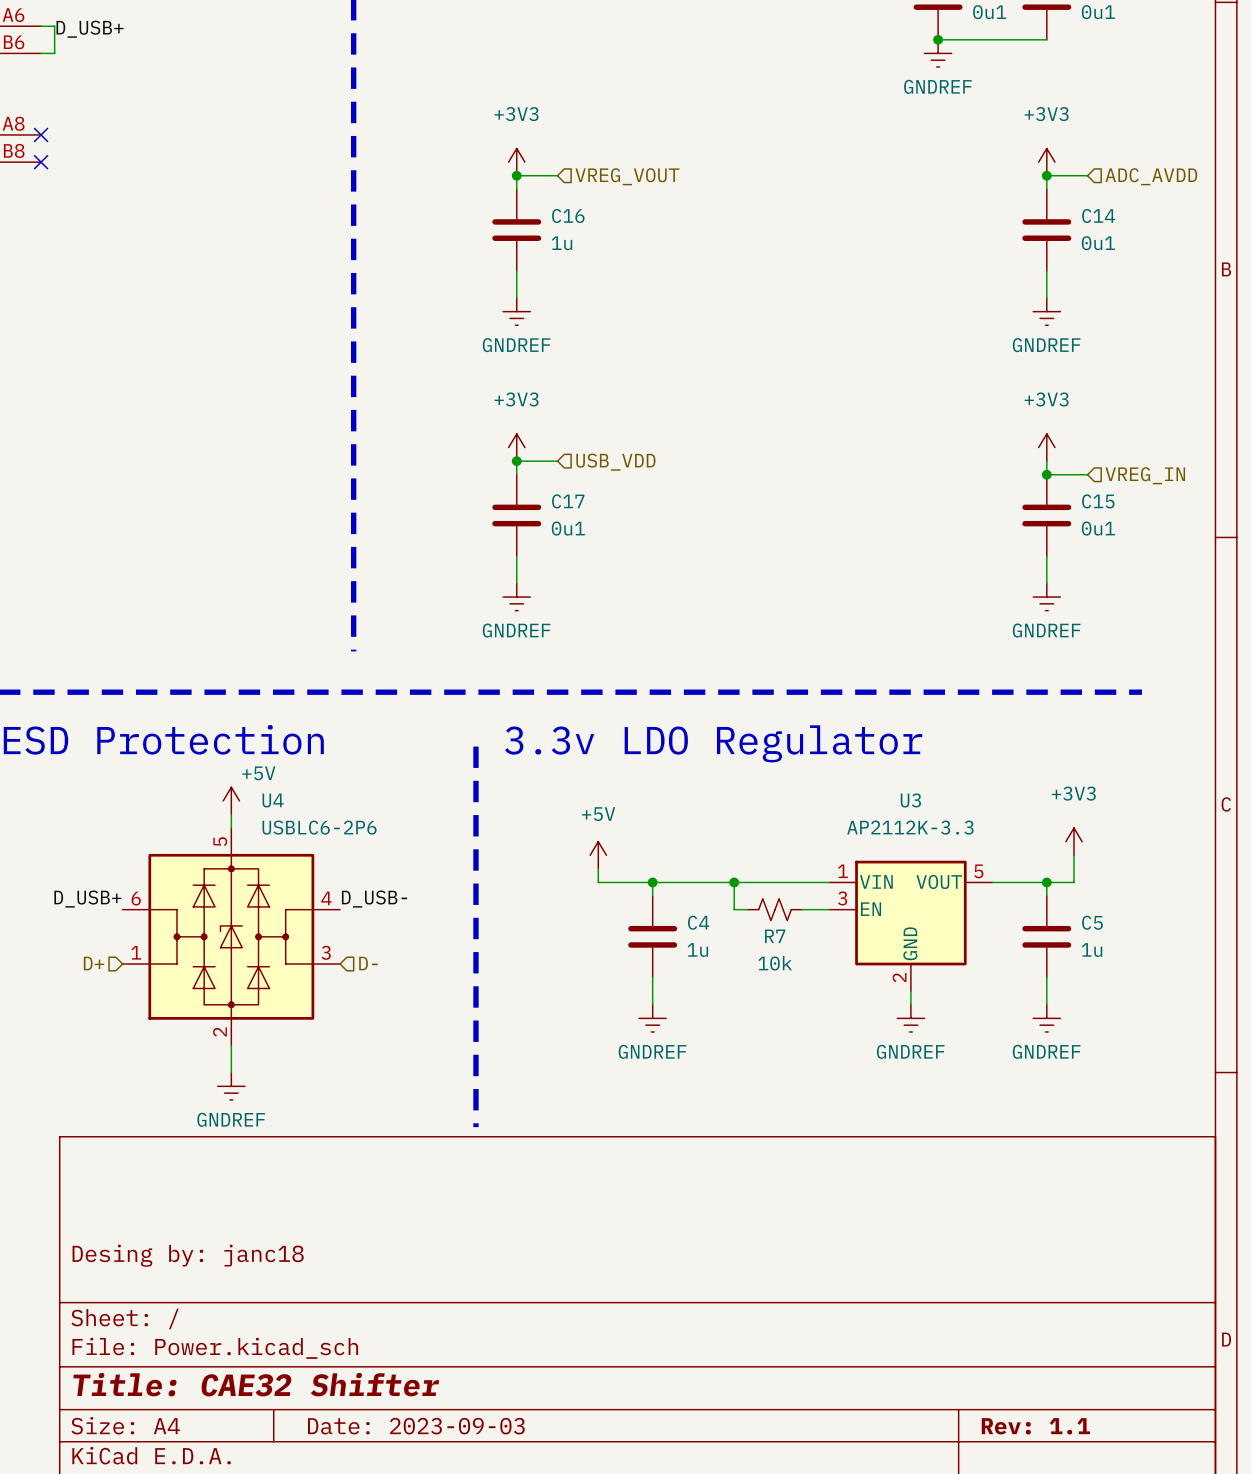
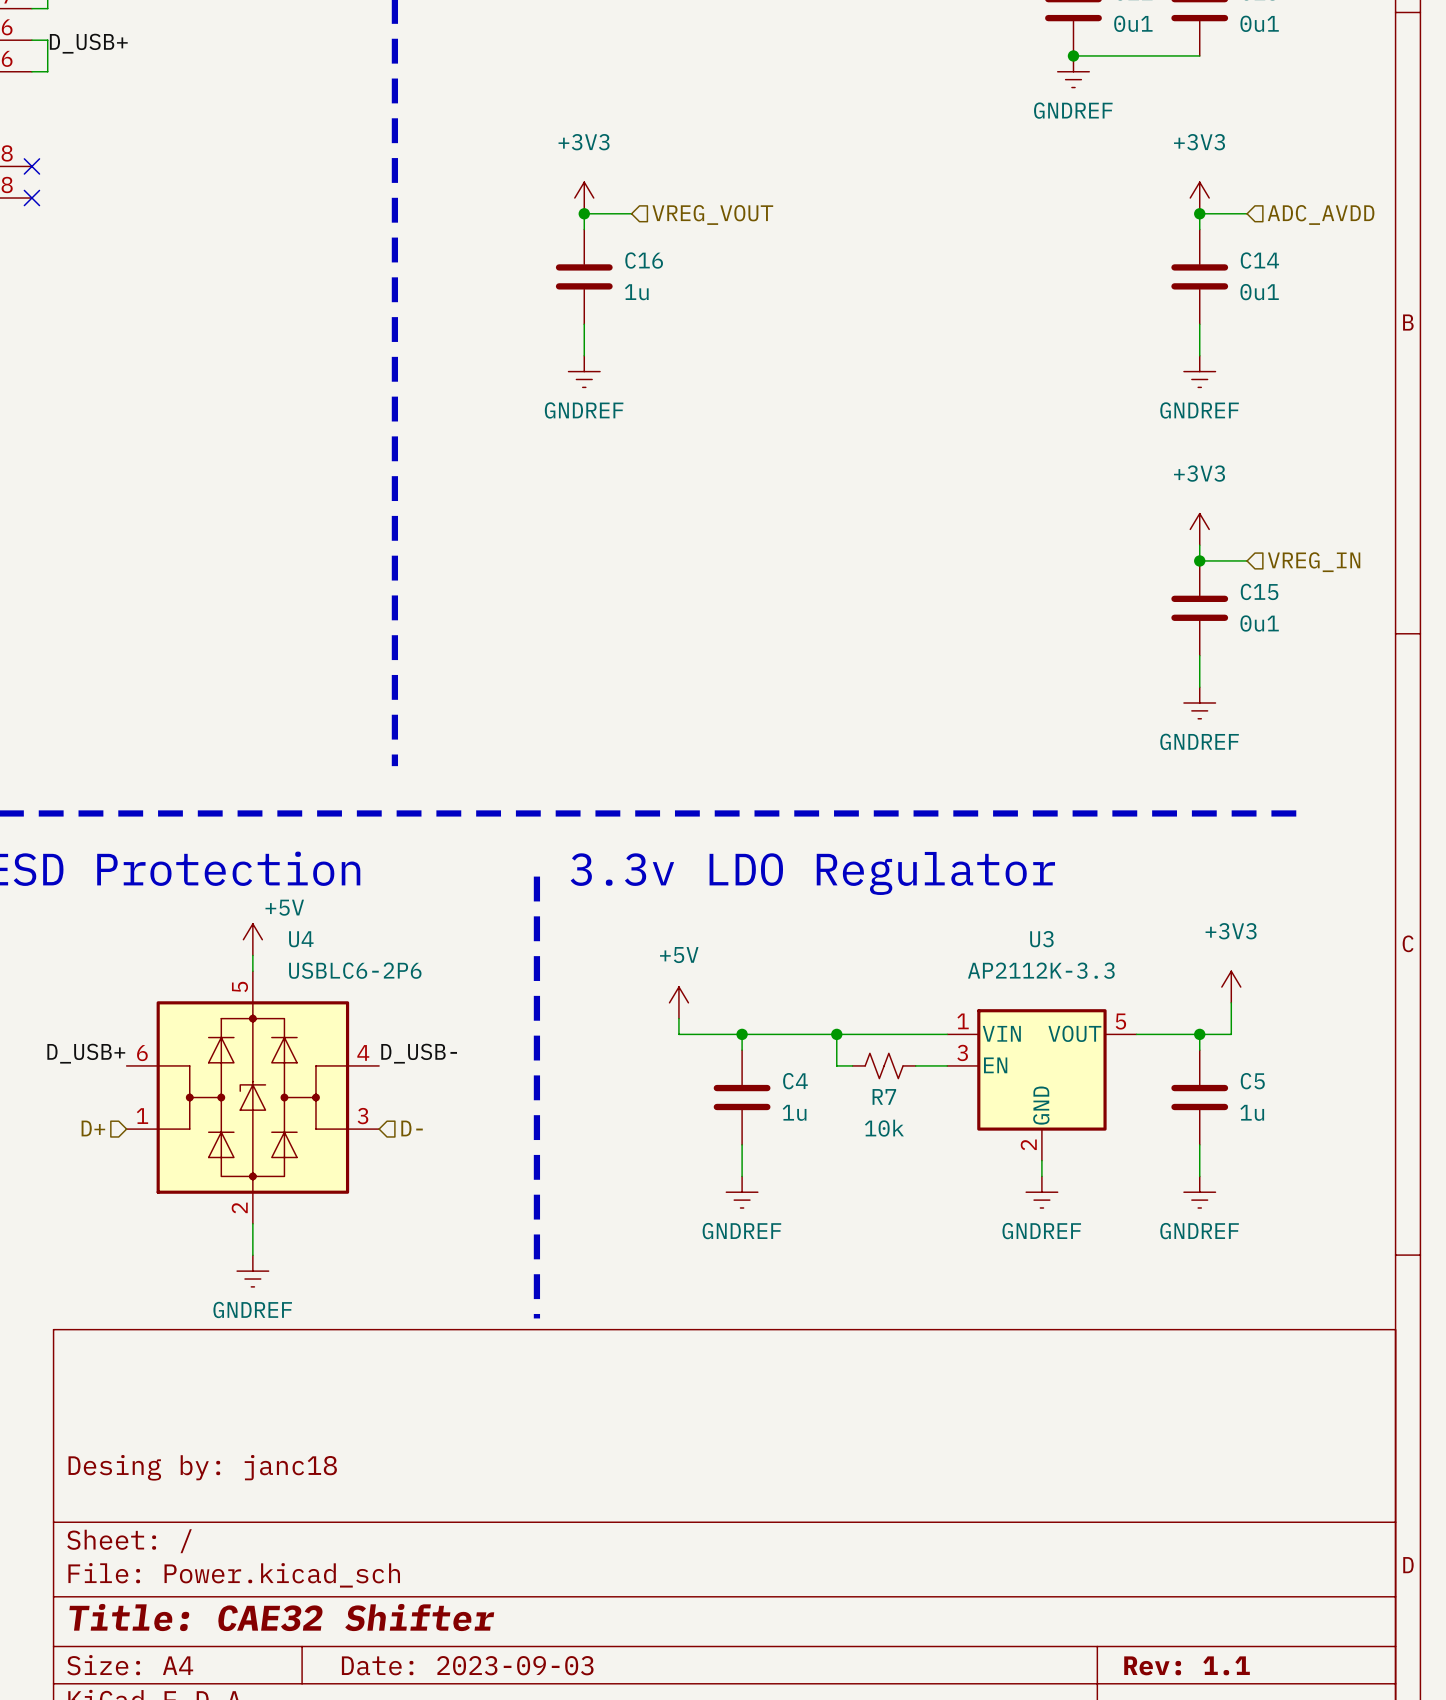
power symbol: +3V3 (516, 447) -> none
junction: (516, 461) -> none
wire: (557, 461) (516, 461) (516, 474) -> none
hierarchical label: USB_VDD (615, 462) -> none
C17: 0u1 (516, 515) -> none
wire: (516, 556) (516, 583) -> none
power symbol: GNDREF (516, 597) -> none

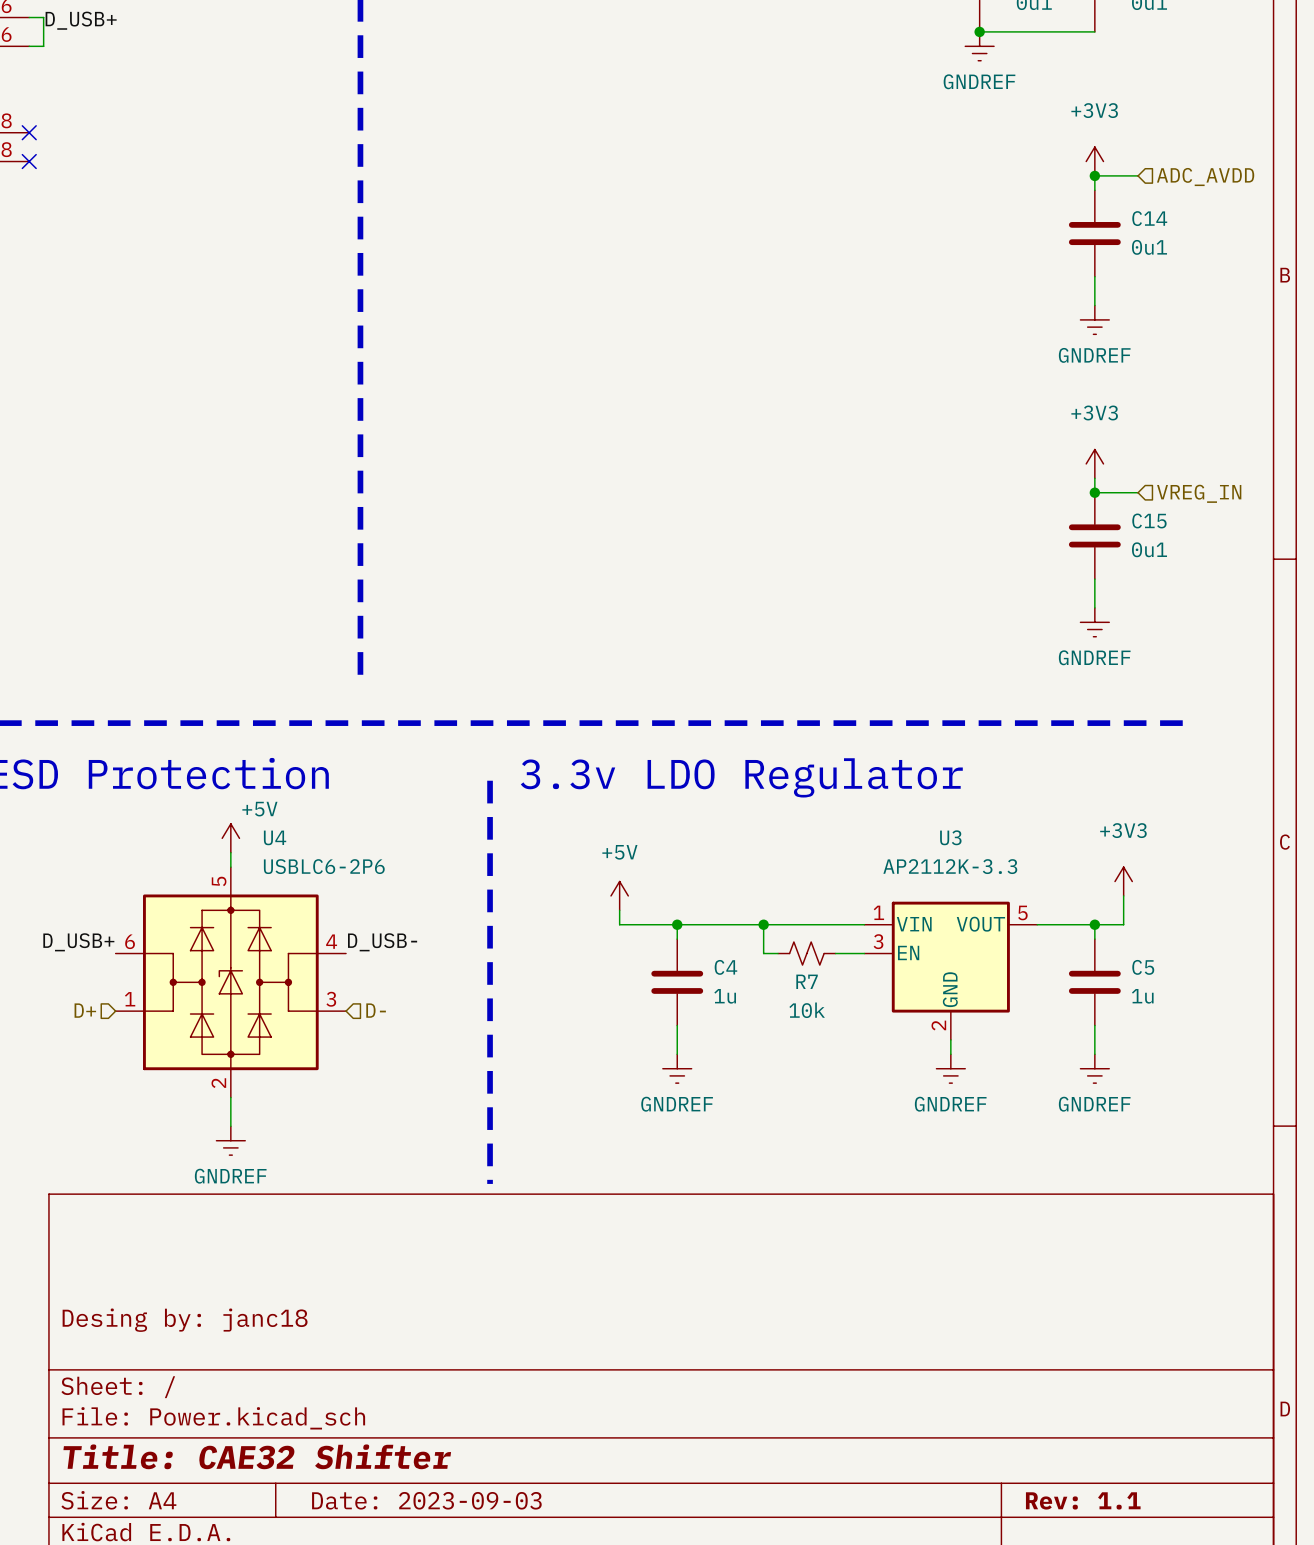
power symbol: +3V3 (584, 198) -> none
junction: (584, 213) -> none
wire: (631, 213) (584, 213) (584, 229) -> none
hierarchical label: VREG_VOUT (712, 214) -> none
C16: 1u (584, 276) -> none
wire: (584, 324) (584, 355) -> none
power symbol: GNDREF (584, 371) -> none

